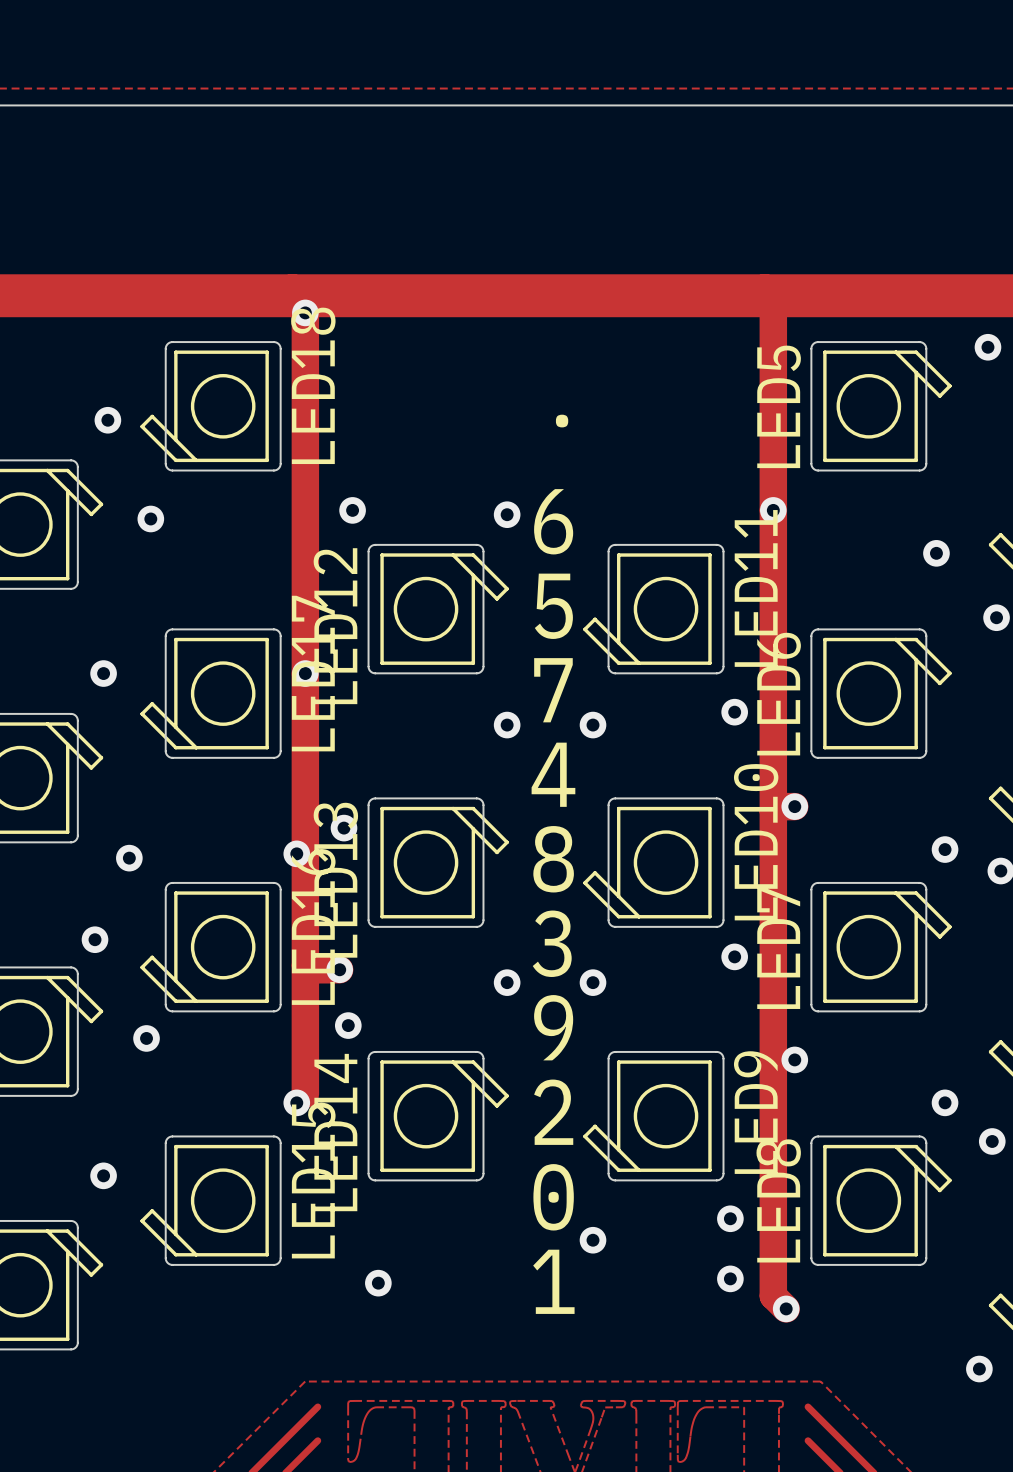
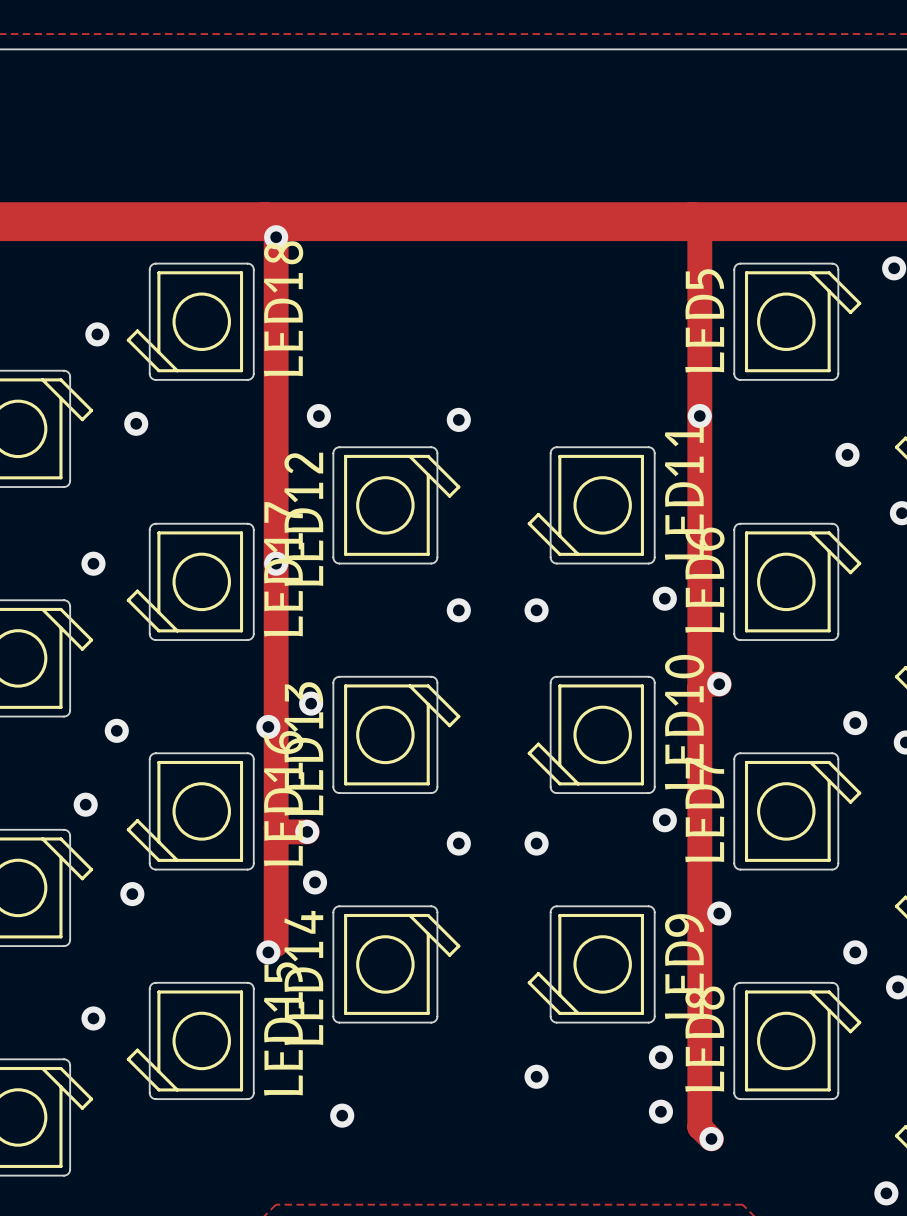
text: . (562, 421) -> none
text: 6 (553, 521) -> none
text: 5 (553, 606) -> none
text: 7 (553, 690) -> none
text: 4 (553, 774) -> none
text: 8 (553, 859) -> none
text: 3 (552, 943) -> none
text: 9 (553, 1027) -> none
text: 2 (553, 1112) -> none
text: 0 (553, 1197) -> none
text: 1 (553, 1281) -> none

